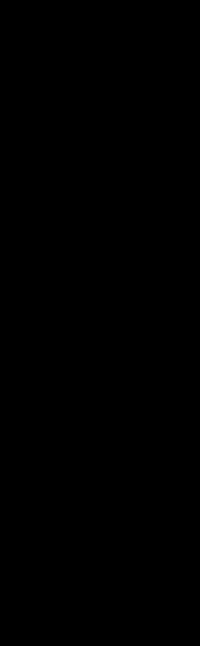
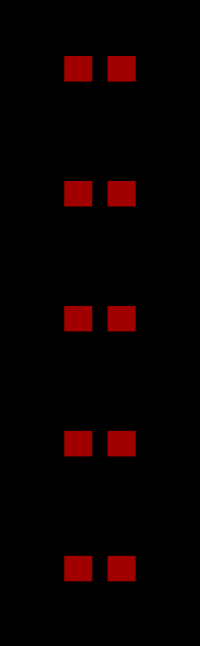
part: none -> (99, 68)
part: none -> (99, 193)
part: none -> (99, 318)
part: none -> (99, 443)
part: none -> (99, 568)

